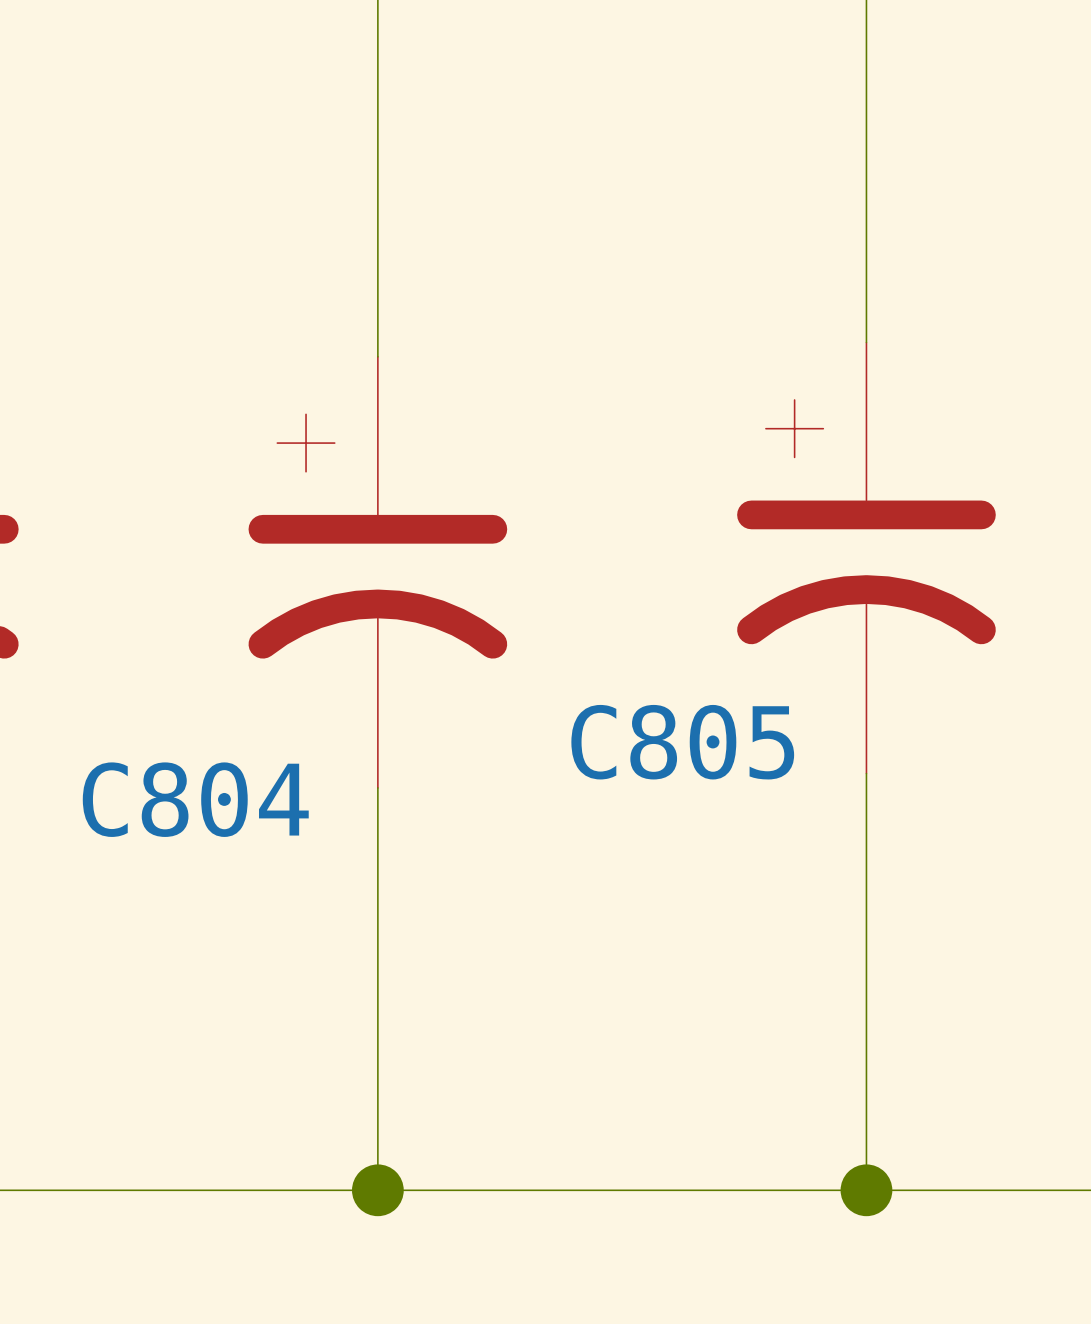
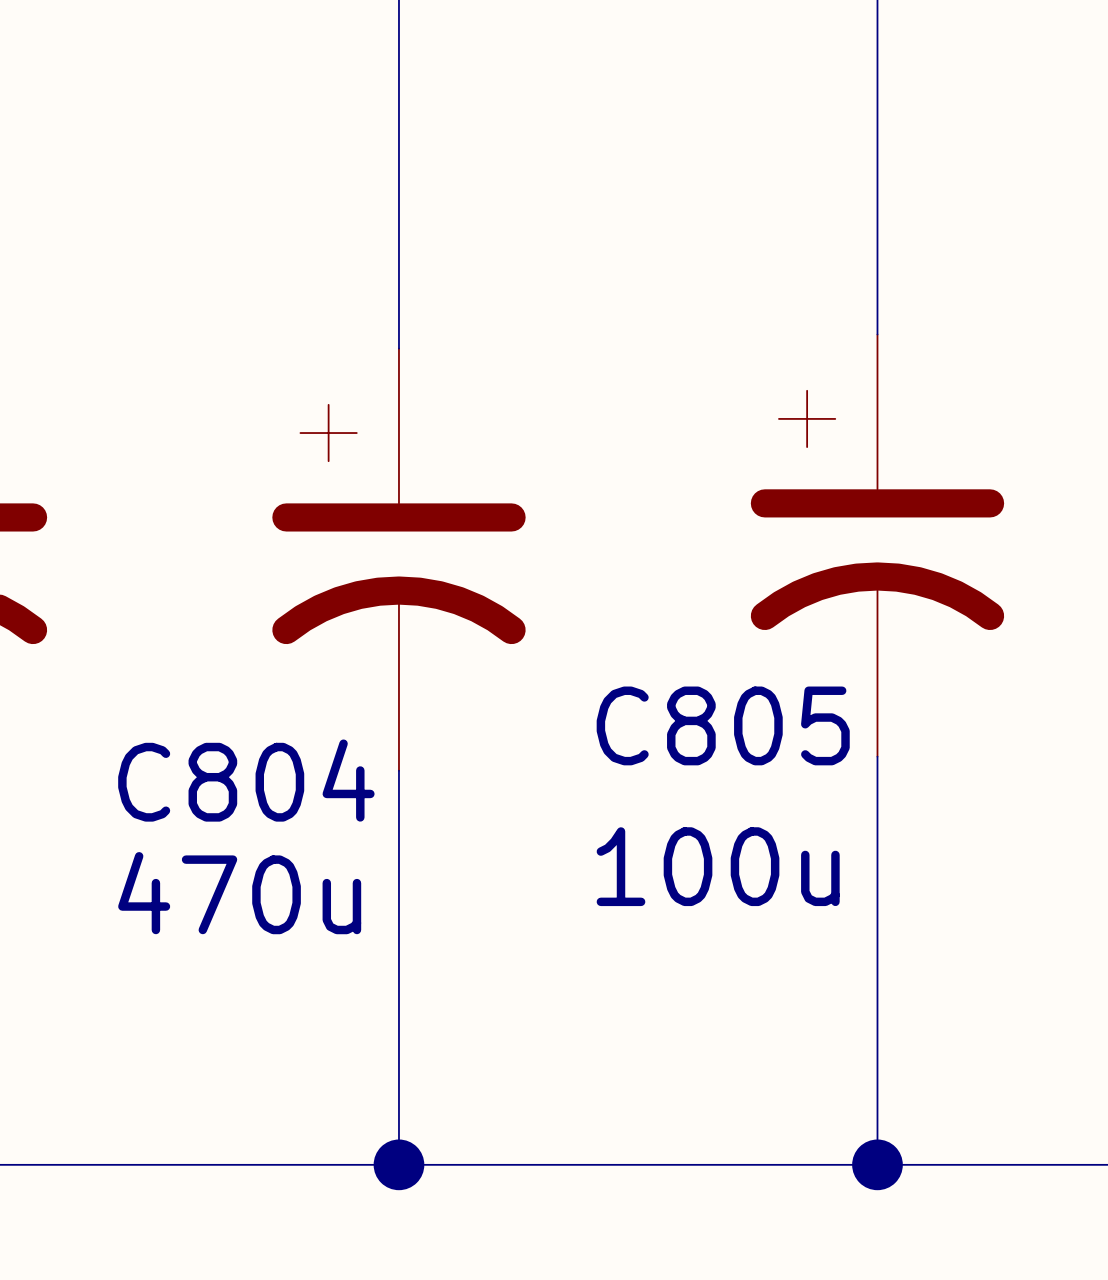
C805 value: none -> 100u (718, 866)
C804 value: none -> 470u (239, 893)

